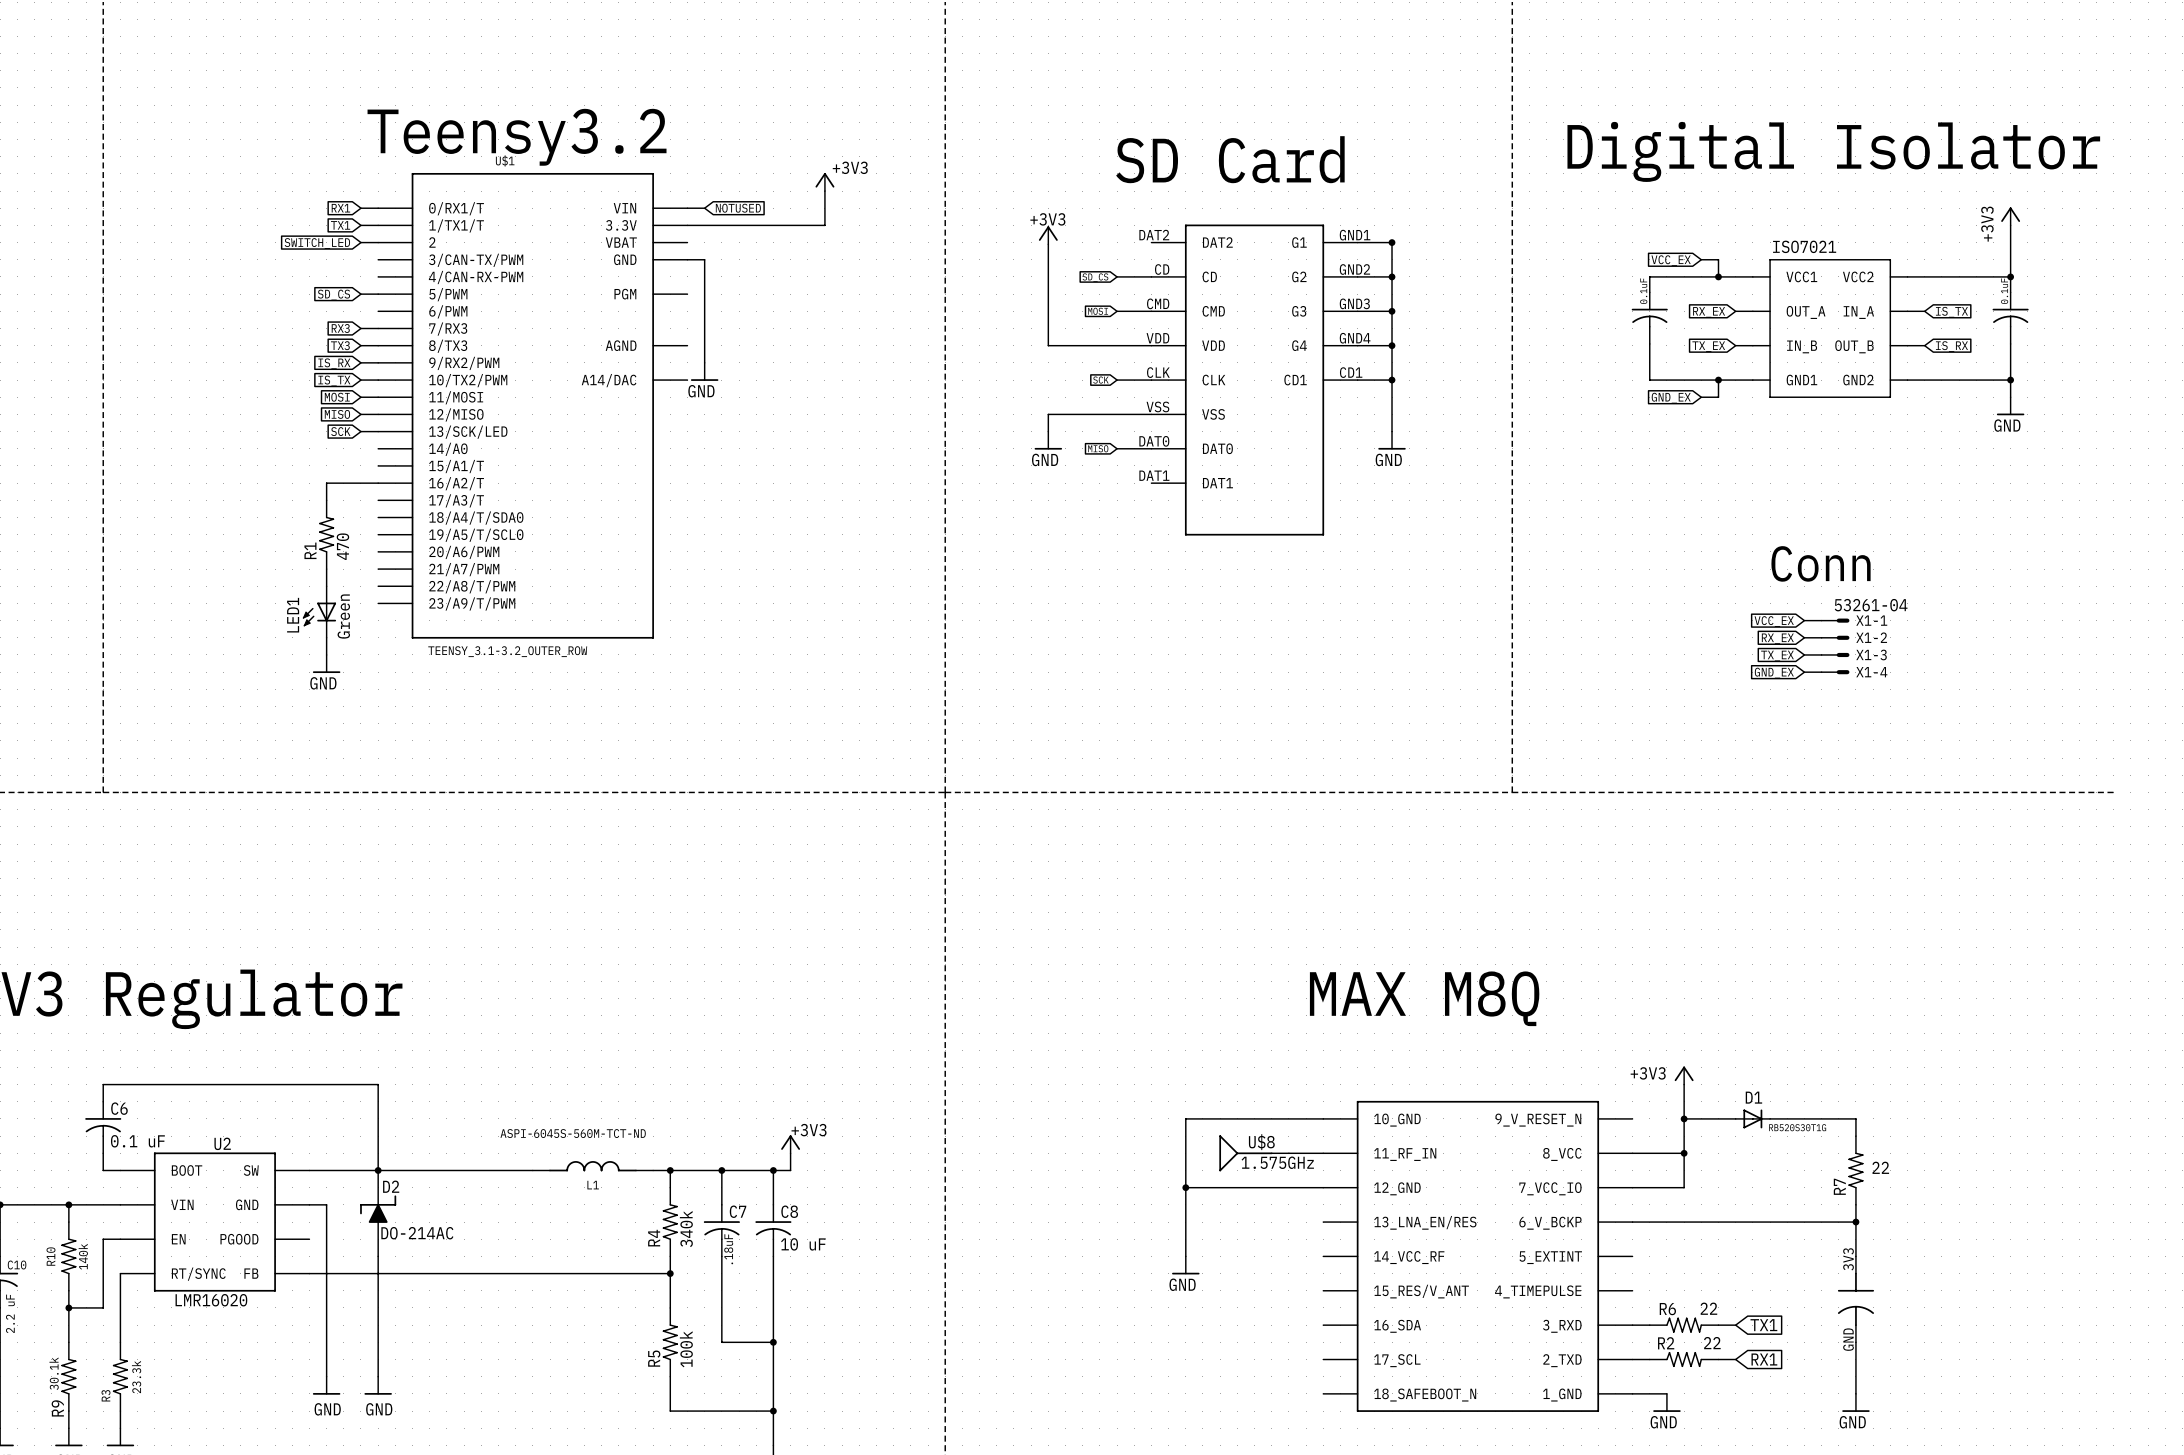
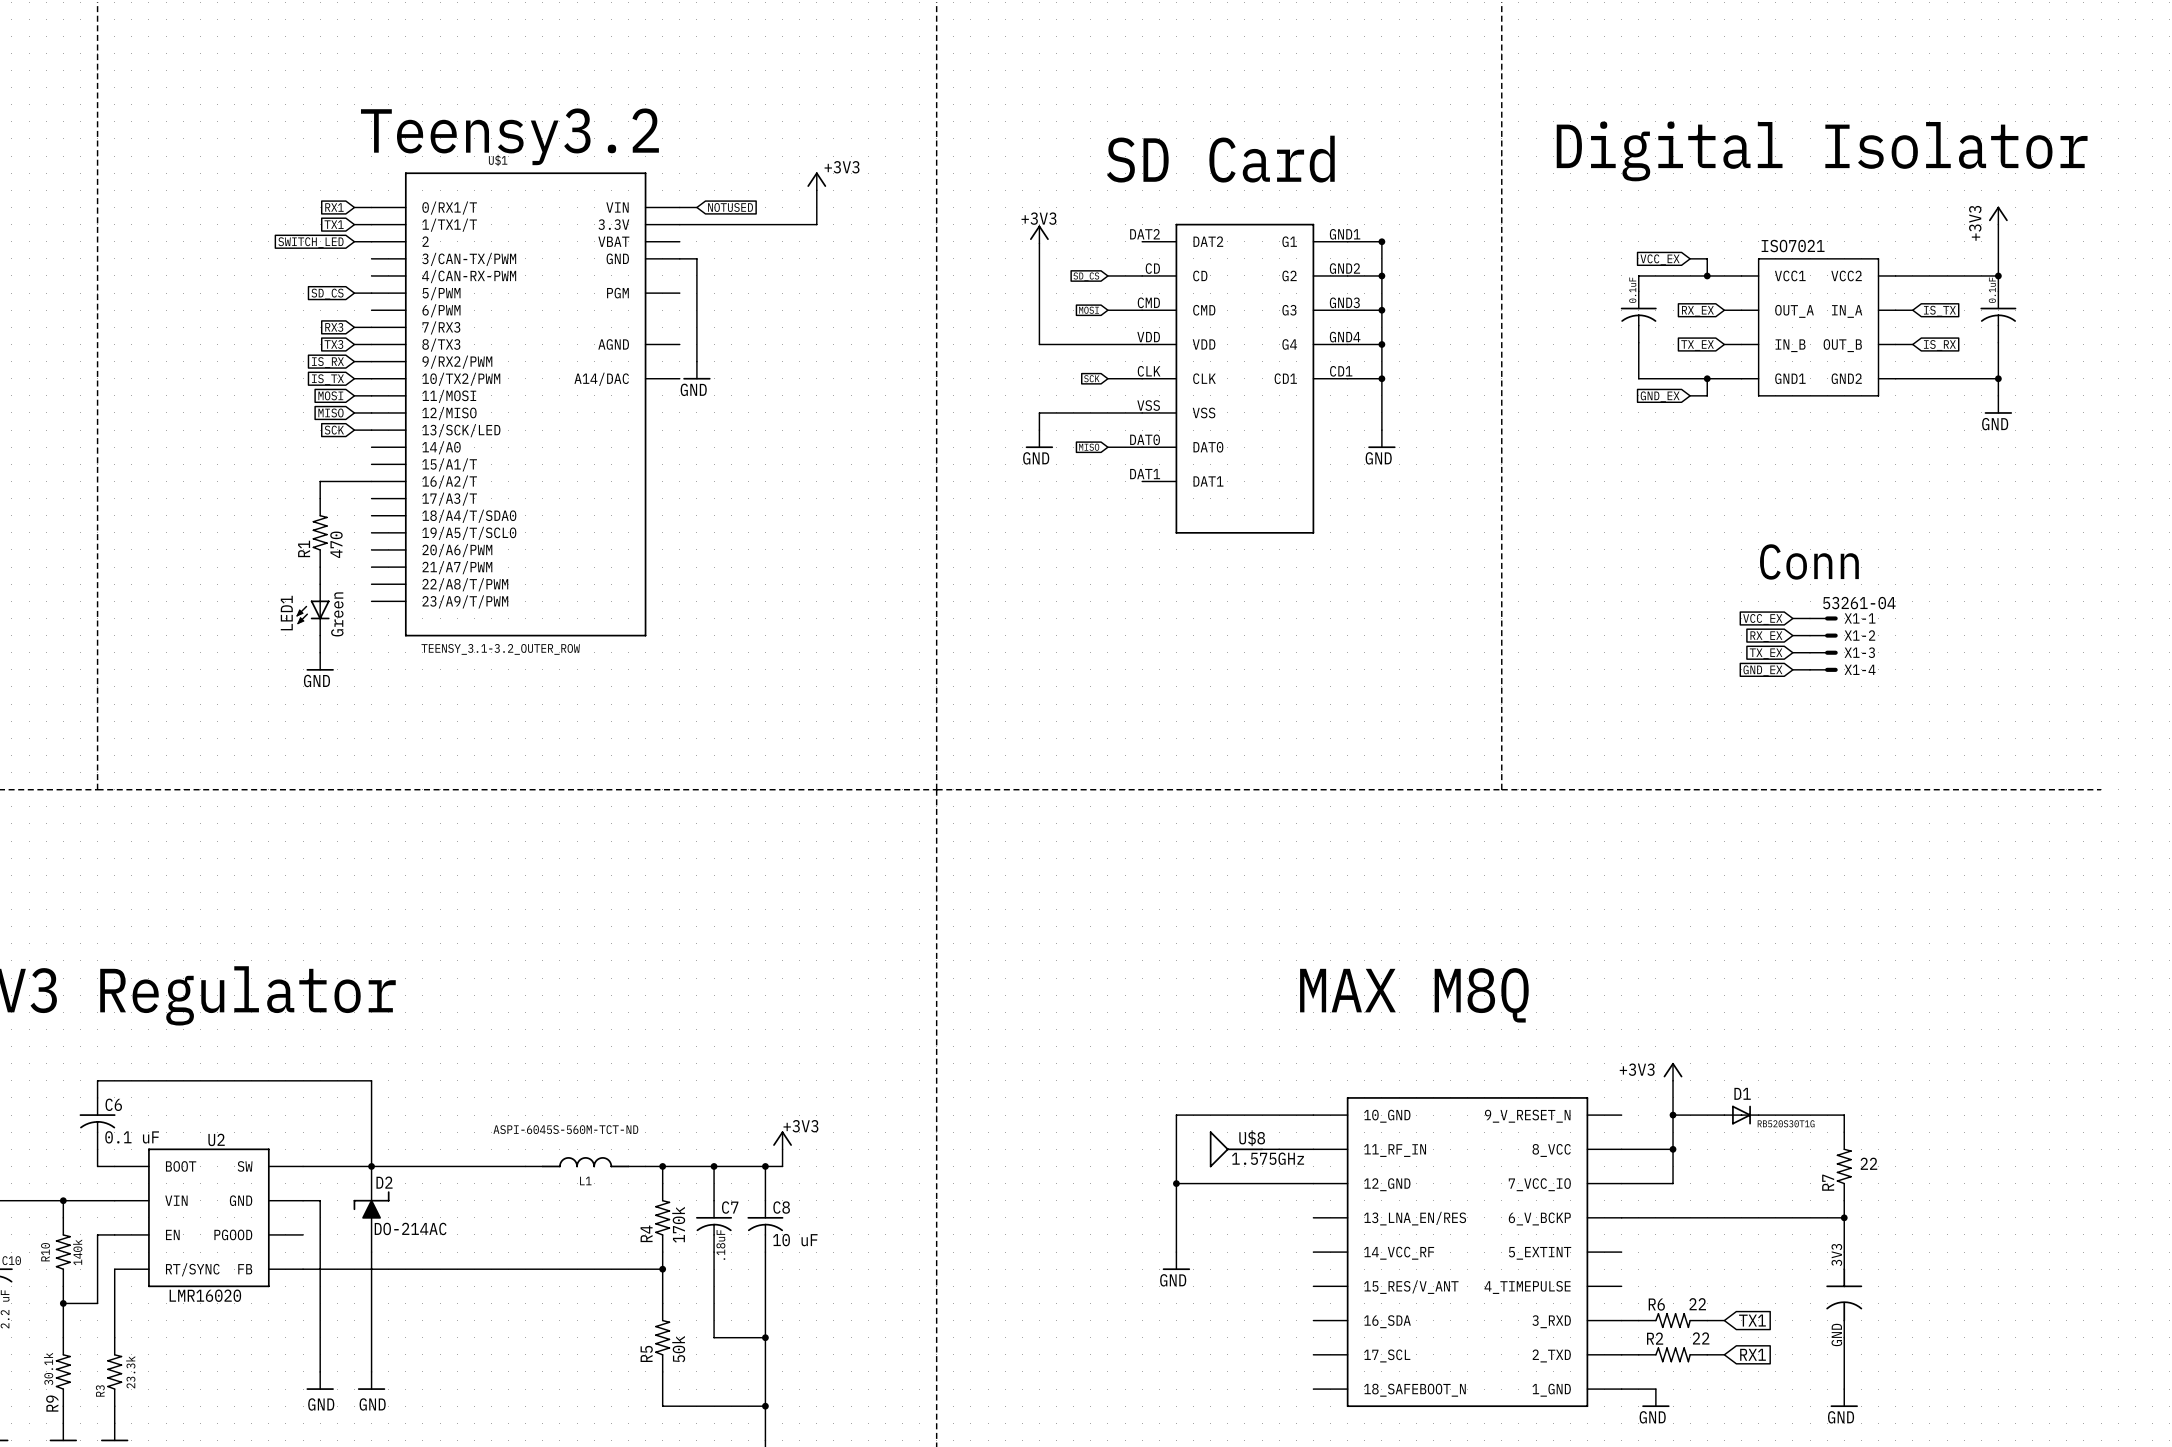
R4 value: 340k (686, 1229) -> 170k (678, 1224)
R5 value: 100k (686, 1349) -> 50k (678, 1349)

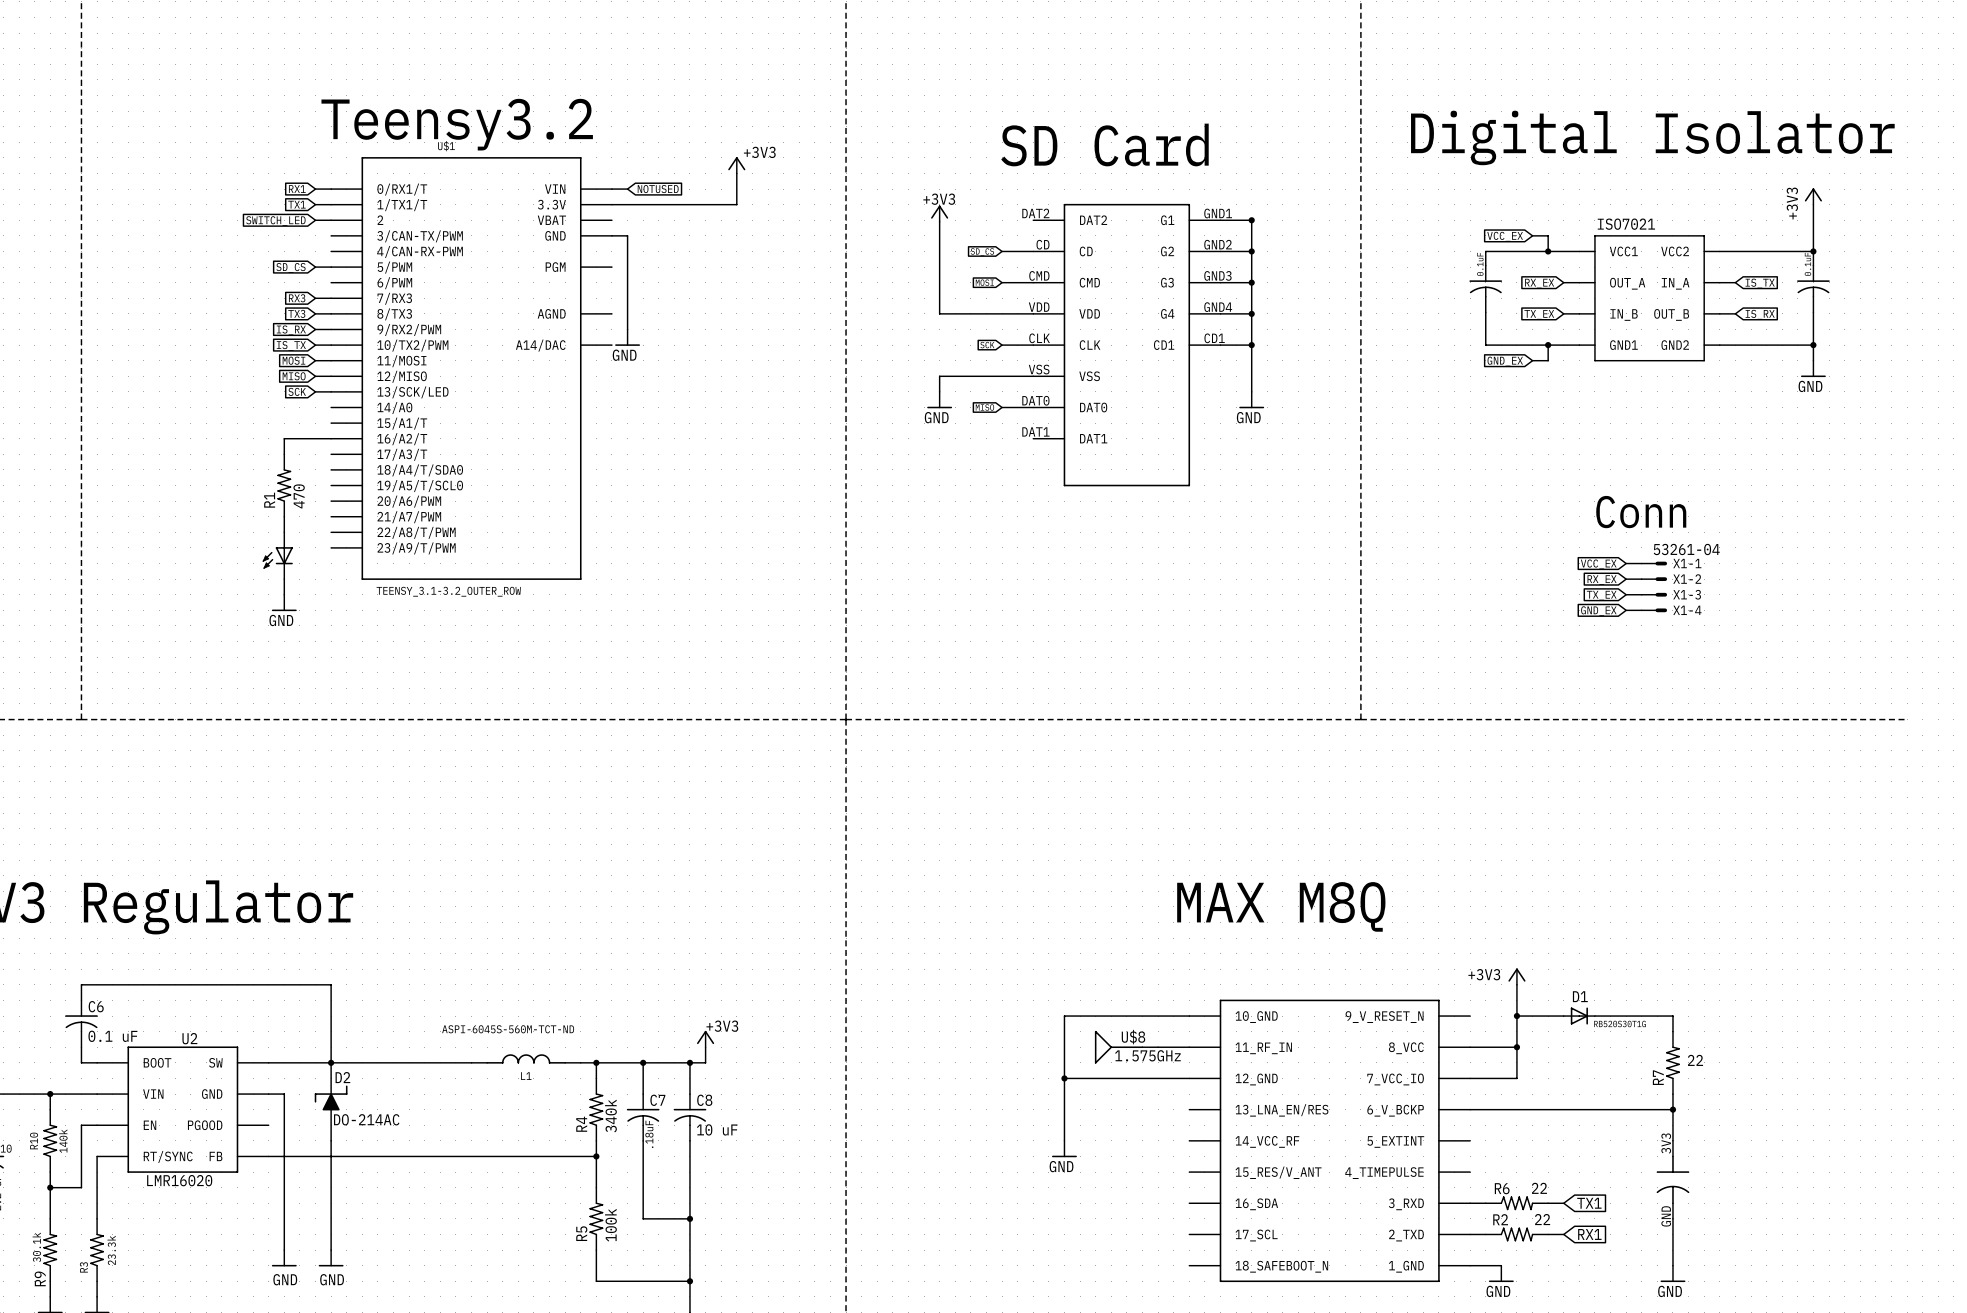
LED1 name: LED1 (286, 613) -> none
LED1 value: Green (337, 614) -> none
R4 value: 170k (678, 1224) -> 340k (610, 1116)
R5 value: 50k (678, 1349) -> 100k (610, 1225)

